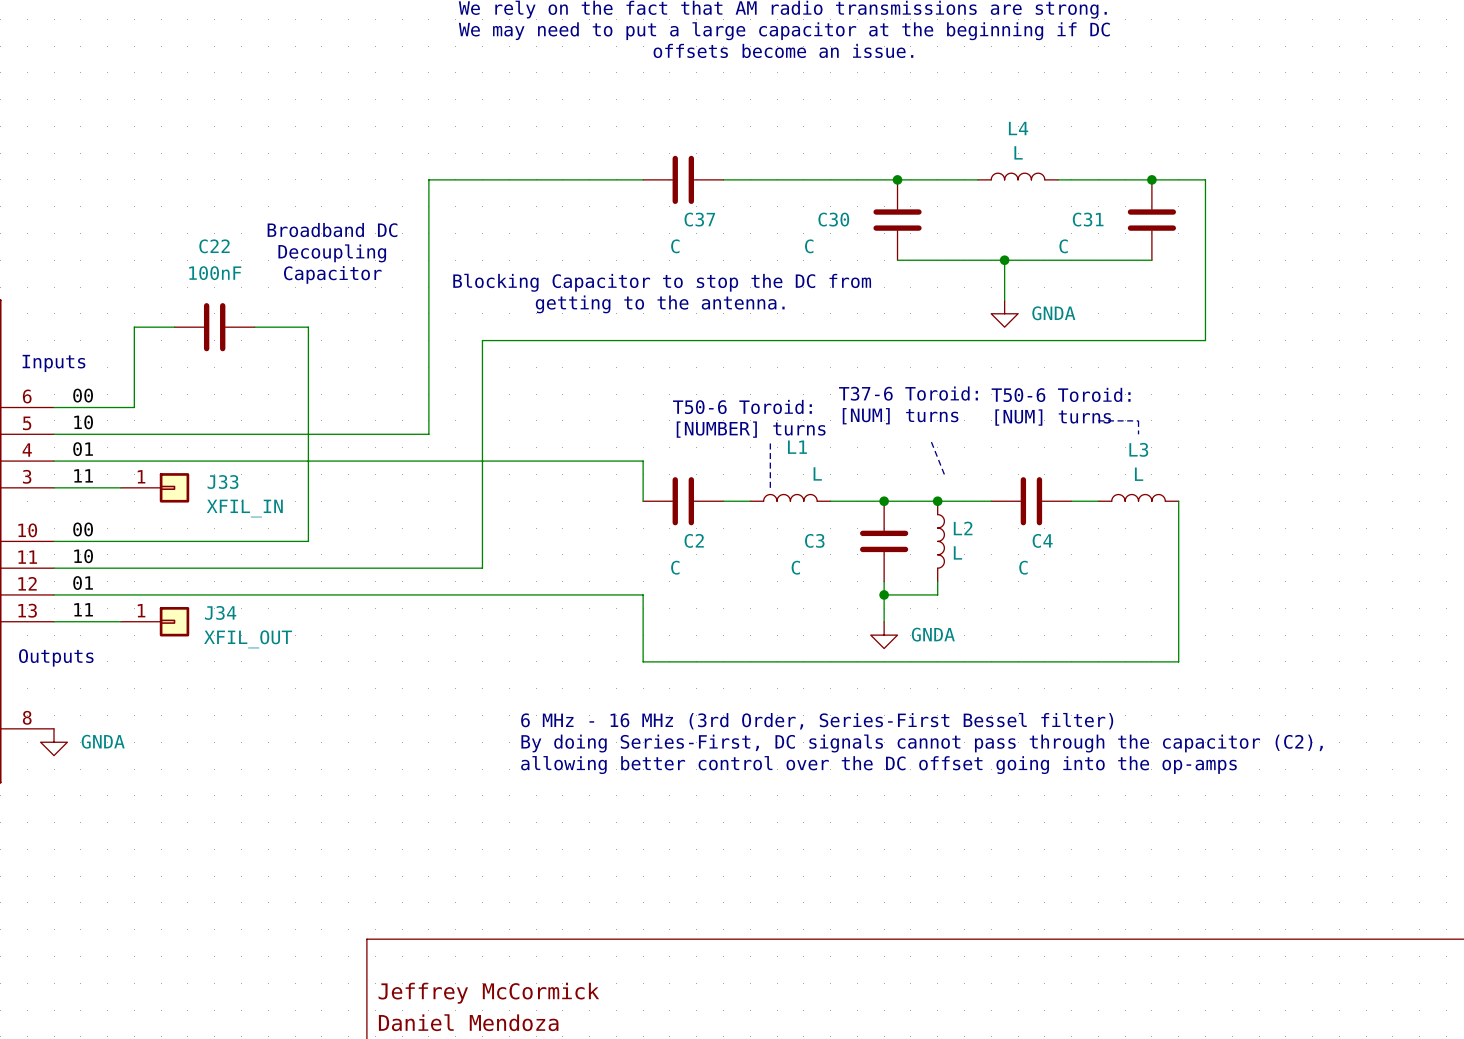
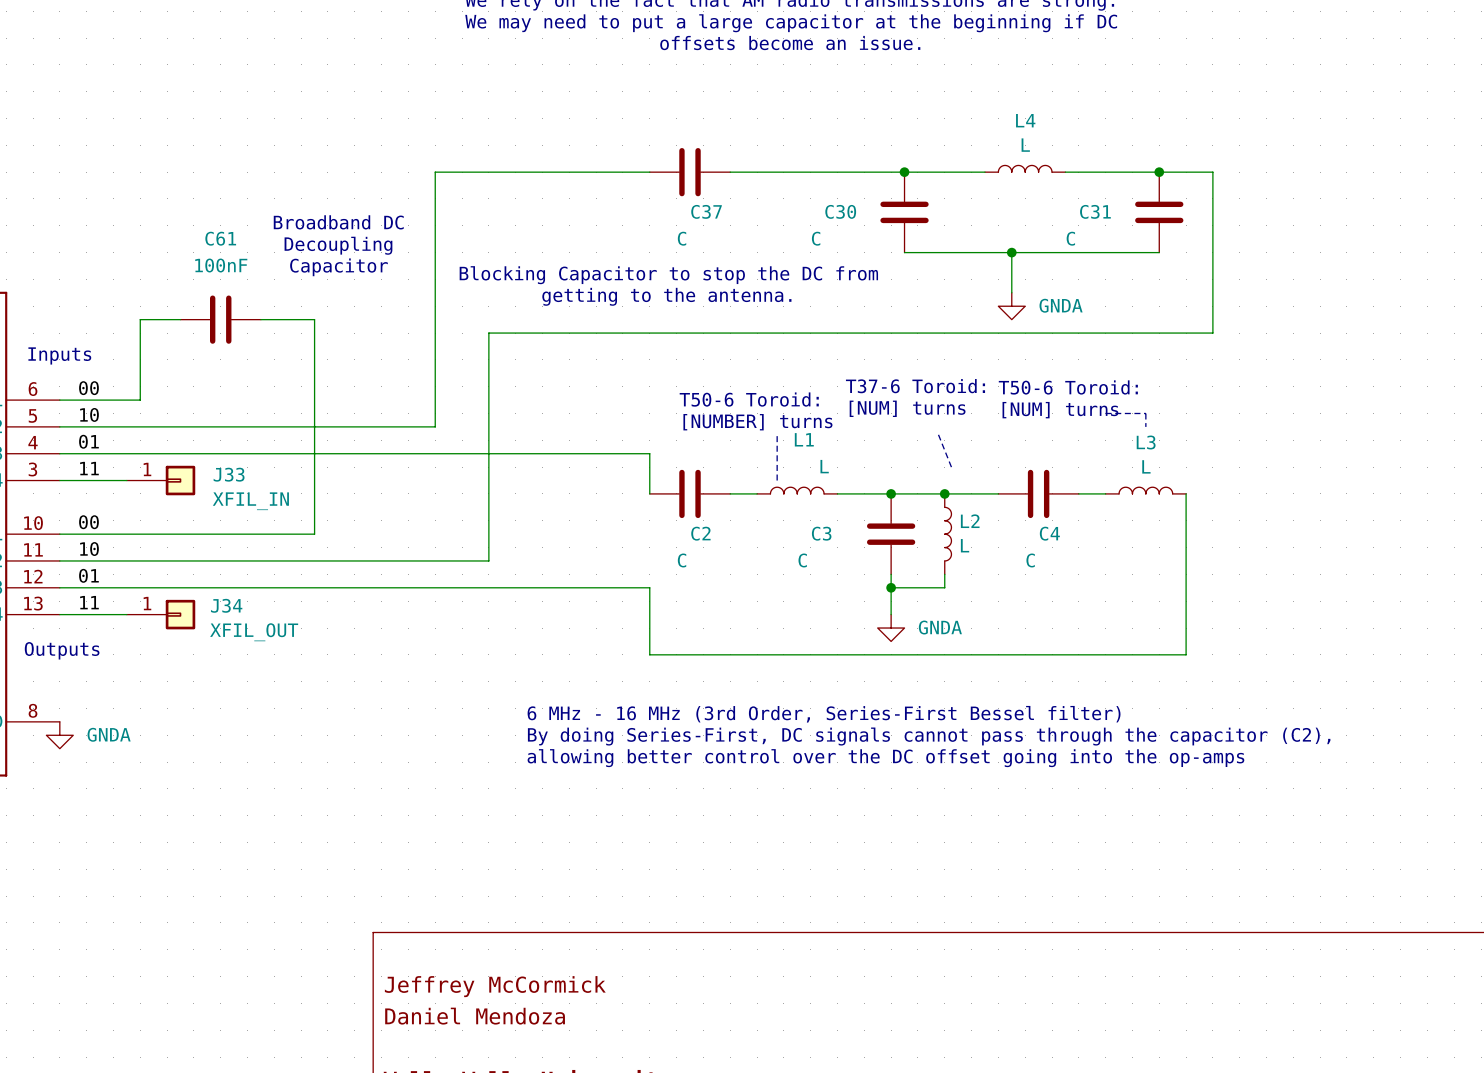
C22 name: C22 (214, 246) -> C61 (220, 238)

